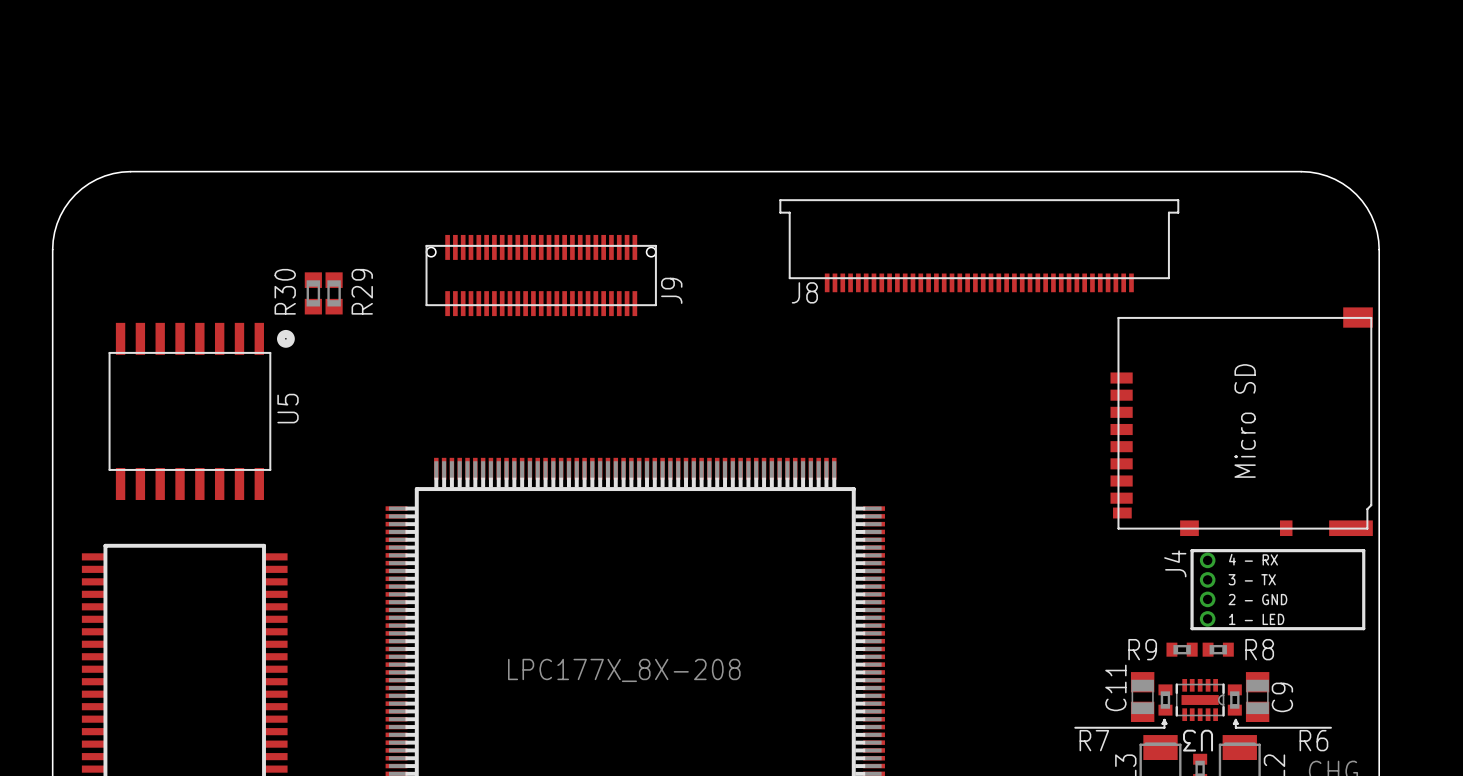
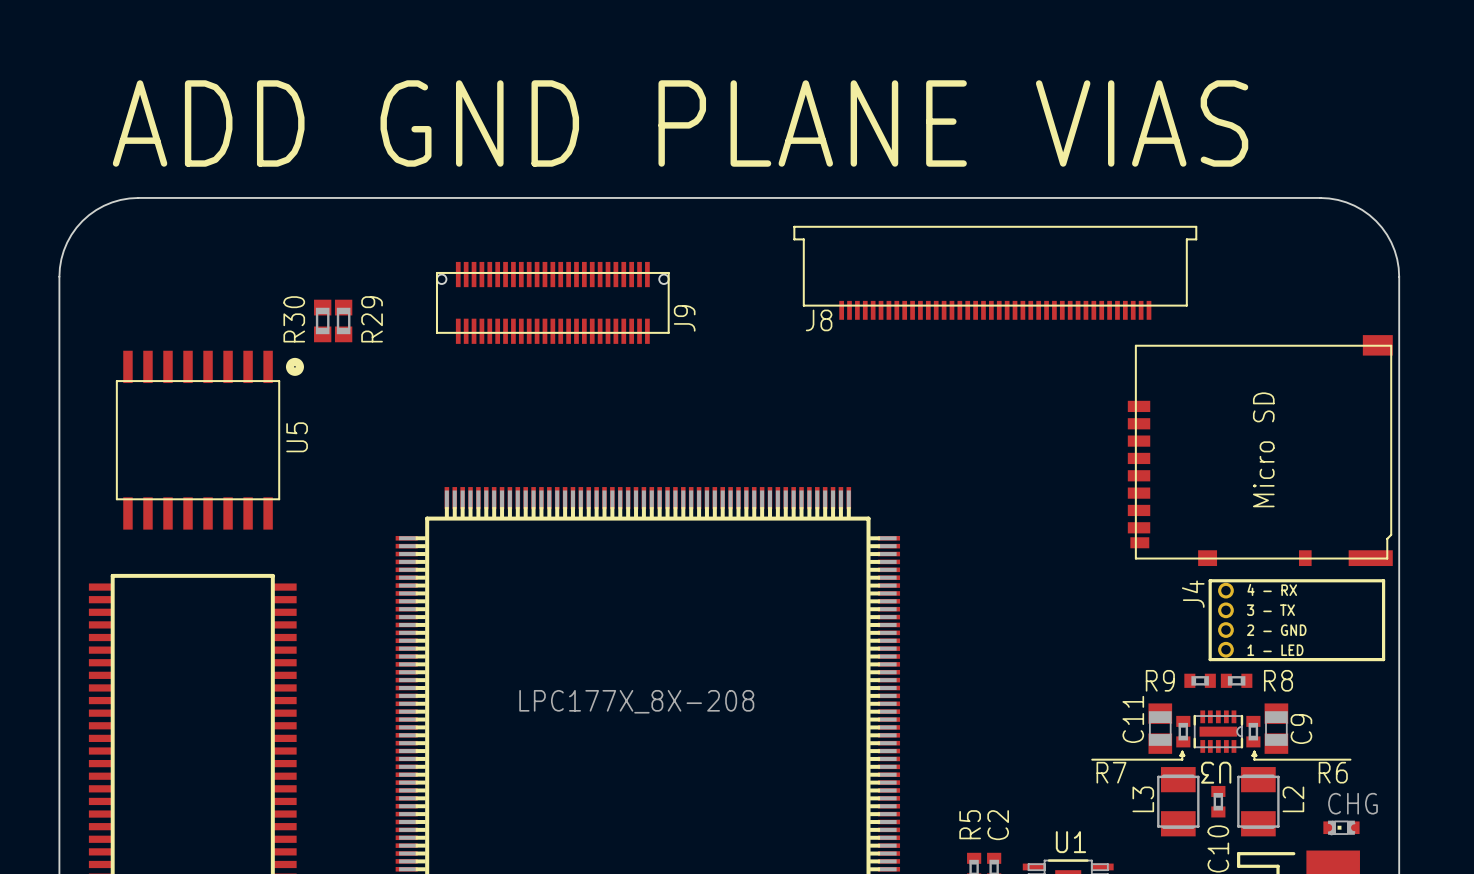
text: none -> ADD GND PLANE VIAS (680, 123)

